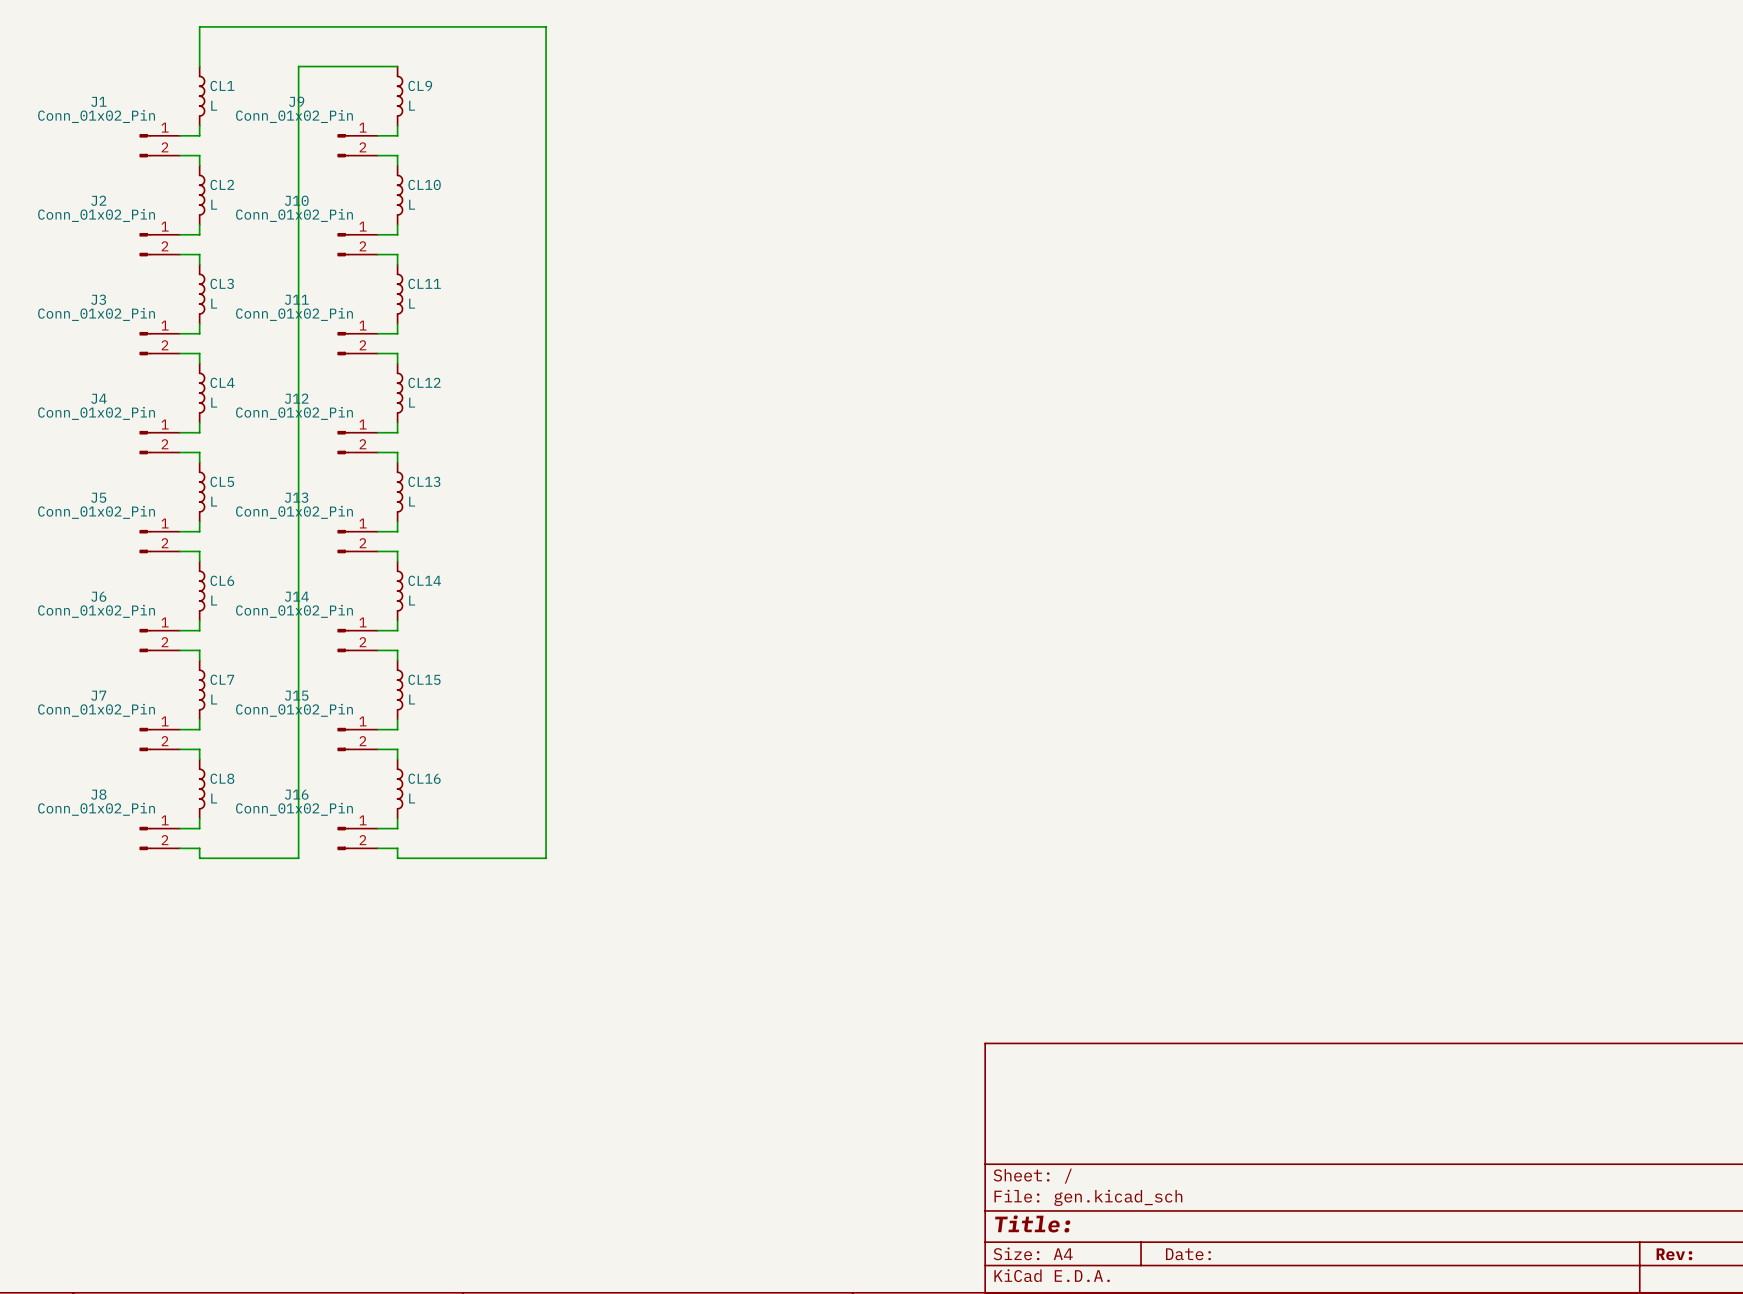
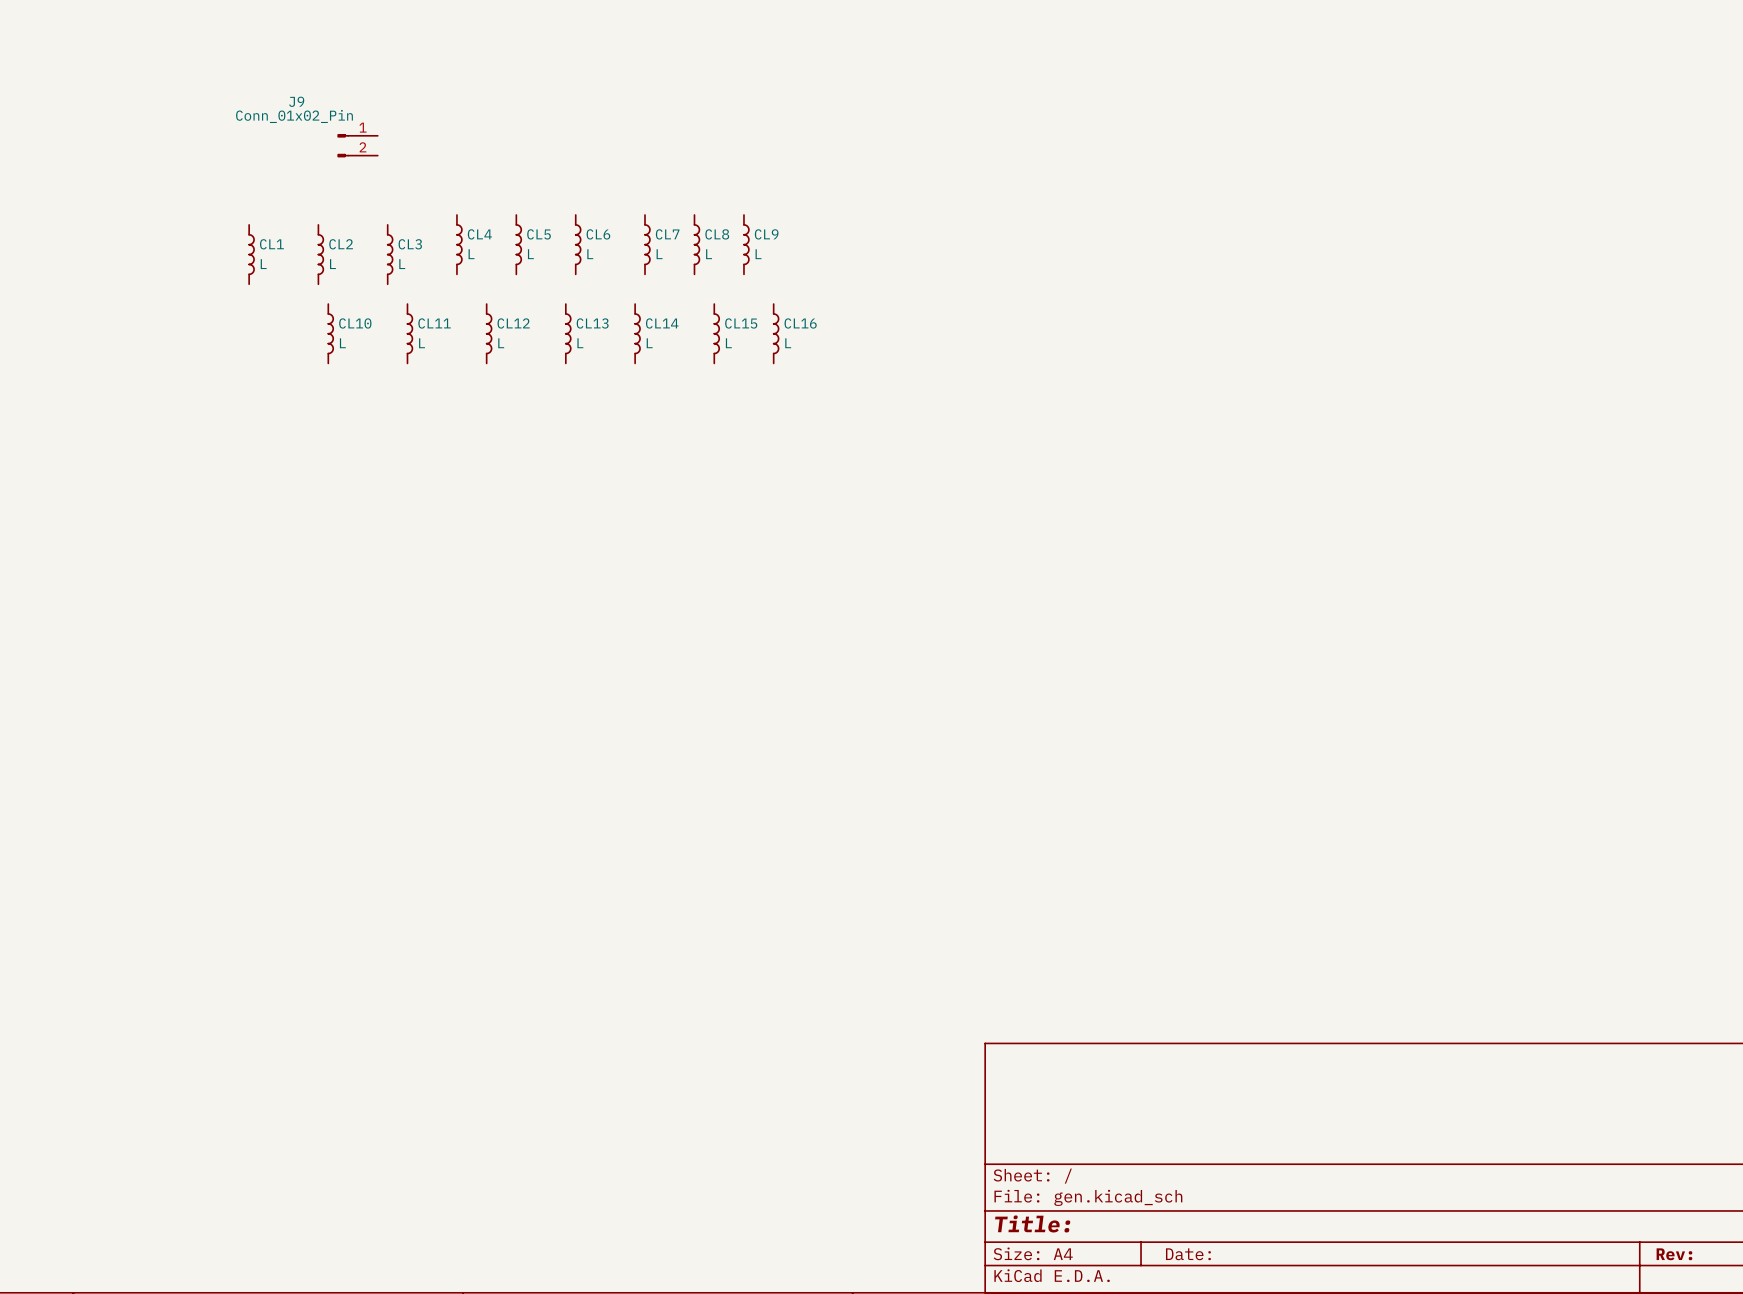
wire: (199, 66) (199, 26) (546, 26) (546, 858) (397, 858) (397, 848) (377, 848) -> none
wire: (397, 66) (298, 66) (298, 858) (199, 858) (199, 848) (179, 848) -> none
CL1 position: (202, 96) -> (251, 254)
CL9 position: (400, 96) -> (746, 244)
wire: (199, 125) (199, 135) (179, 135) -> none
wire: (397, 125) (397, 135) (377, 135) -> none
J1: Conn_01x02_Pin (159, 145) -> none
wire: (179, 155) (199, 155) (199, 165) -> none
wire: (377, 155) (397, 155) (397, 165) -> none
CL2 position: (202, 195) -> (320, 254)
CL10 position: (400, 195) -> (330, 333)
wire: (199, 224) (199, 234) (179, 234) -> none
wire: (397, 224) (397, 234) (377, 234) -> none
J2: Conn_01x02_Pin (159, 244) -> none
J10: Conn_01x02_Pin (357, 244) -> none
wire: (179, 254) (199, 254) (199, 264) -> none
wire: (377, 254) (397, 254) (397, 264) -> none
CL3 position: (202, 294) -> (390, 254)
CL11 position: (400, 294) -> (409, 333)
wire: (199, 323) (199, 333) (179, 333) -> none
wire: (397, 323) (397, 333) (377, 333) -> none
J3: Conn_01x02_Pin (159, 343) -> none
J11: Conn_01x02_Pin (357, 343) -> none
wire: (179, 353) (199, 353) (199, 363) -> none
wire: (377, 353) (397, 353) (397, 363) -> none
CL4 position: (202, 393) -> (459, 244)
CL12 position: (400, 393) -> (489, 333)
wire: (199, 422) (199, 432) (179, 432) -> none
wire: (397, 422) (397, 432) (377, 432) -> none
J4: Conn_01x02_Pin (159, 442) -> none
J12: Conn_01x02_Pin (357, 442) -> none
wire: (179, 452) (199, 452) (199, 462) -> none
wire: (377, 452) (397, 452) (397, 462) -> none
CL5 position: (202, 492) -> (518, 244)
CL13 position: (400, 492) -> (568, 333)
wire: (199, 521) (199, 531) (179, 531) -> none
wire: (397, 521) (397, 531) (377, 531) -> none
J5: Conn_01x02_Pin (159, 541) -> none
J13: Conn_01x02_Pin (357, 541) -> none
wire: (179, 551) (199, 551) (199, 561) -> none
wire: (377, 551) (397, 551) (397, 561) -> none
CL6 position: (202, 591) -> (578, 244)
CL14 position: (400, 591) -> (637, 333)
wire: (199, 620) (199, 630) (179, 630) -> none
wire: (397, 620) (397, 630) (377, 630) -> none
J6: Conn_01x02_Pin (159, 640) -> none
J14: Conn_01x02_Pin (357, 640) -> none
wire: (179, 650) (199, 650) (199, 660) -> none
wire: (377, 650) (397, 650) (397, 660) -> none
CL7 position: (202, 690) -> (647, 244)
CL15 position: (400, 690) -> (716, 333)
wire: (199, 719) (199, 729) (179, 729) -> none
wire: (397, 719) (397, 729) (377, 729) -> none
J7: Conn_01x02_Pin (159, 739) -> none
J15: Conn_01x02_Pin (357, 739) -> none
wire: (179, 749) (199, 749) (199, 759) -> none
wire: (377, 749) (397, 749) (397, 759) -> none
CL8 position: (202, 789) -> (696, 244)
CL16 position: (400, 789) -> (776, 333)
wire: (199, 818) (199, 828) (179, 828) -> none
wire: (397, 818) (397, 828) (377, 828) -> none
J8: Conn_01x02_Pin (159, 838) -> none
J16: Conn_01x02_Pin (357, 838) -> none

